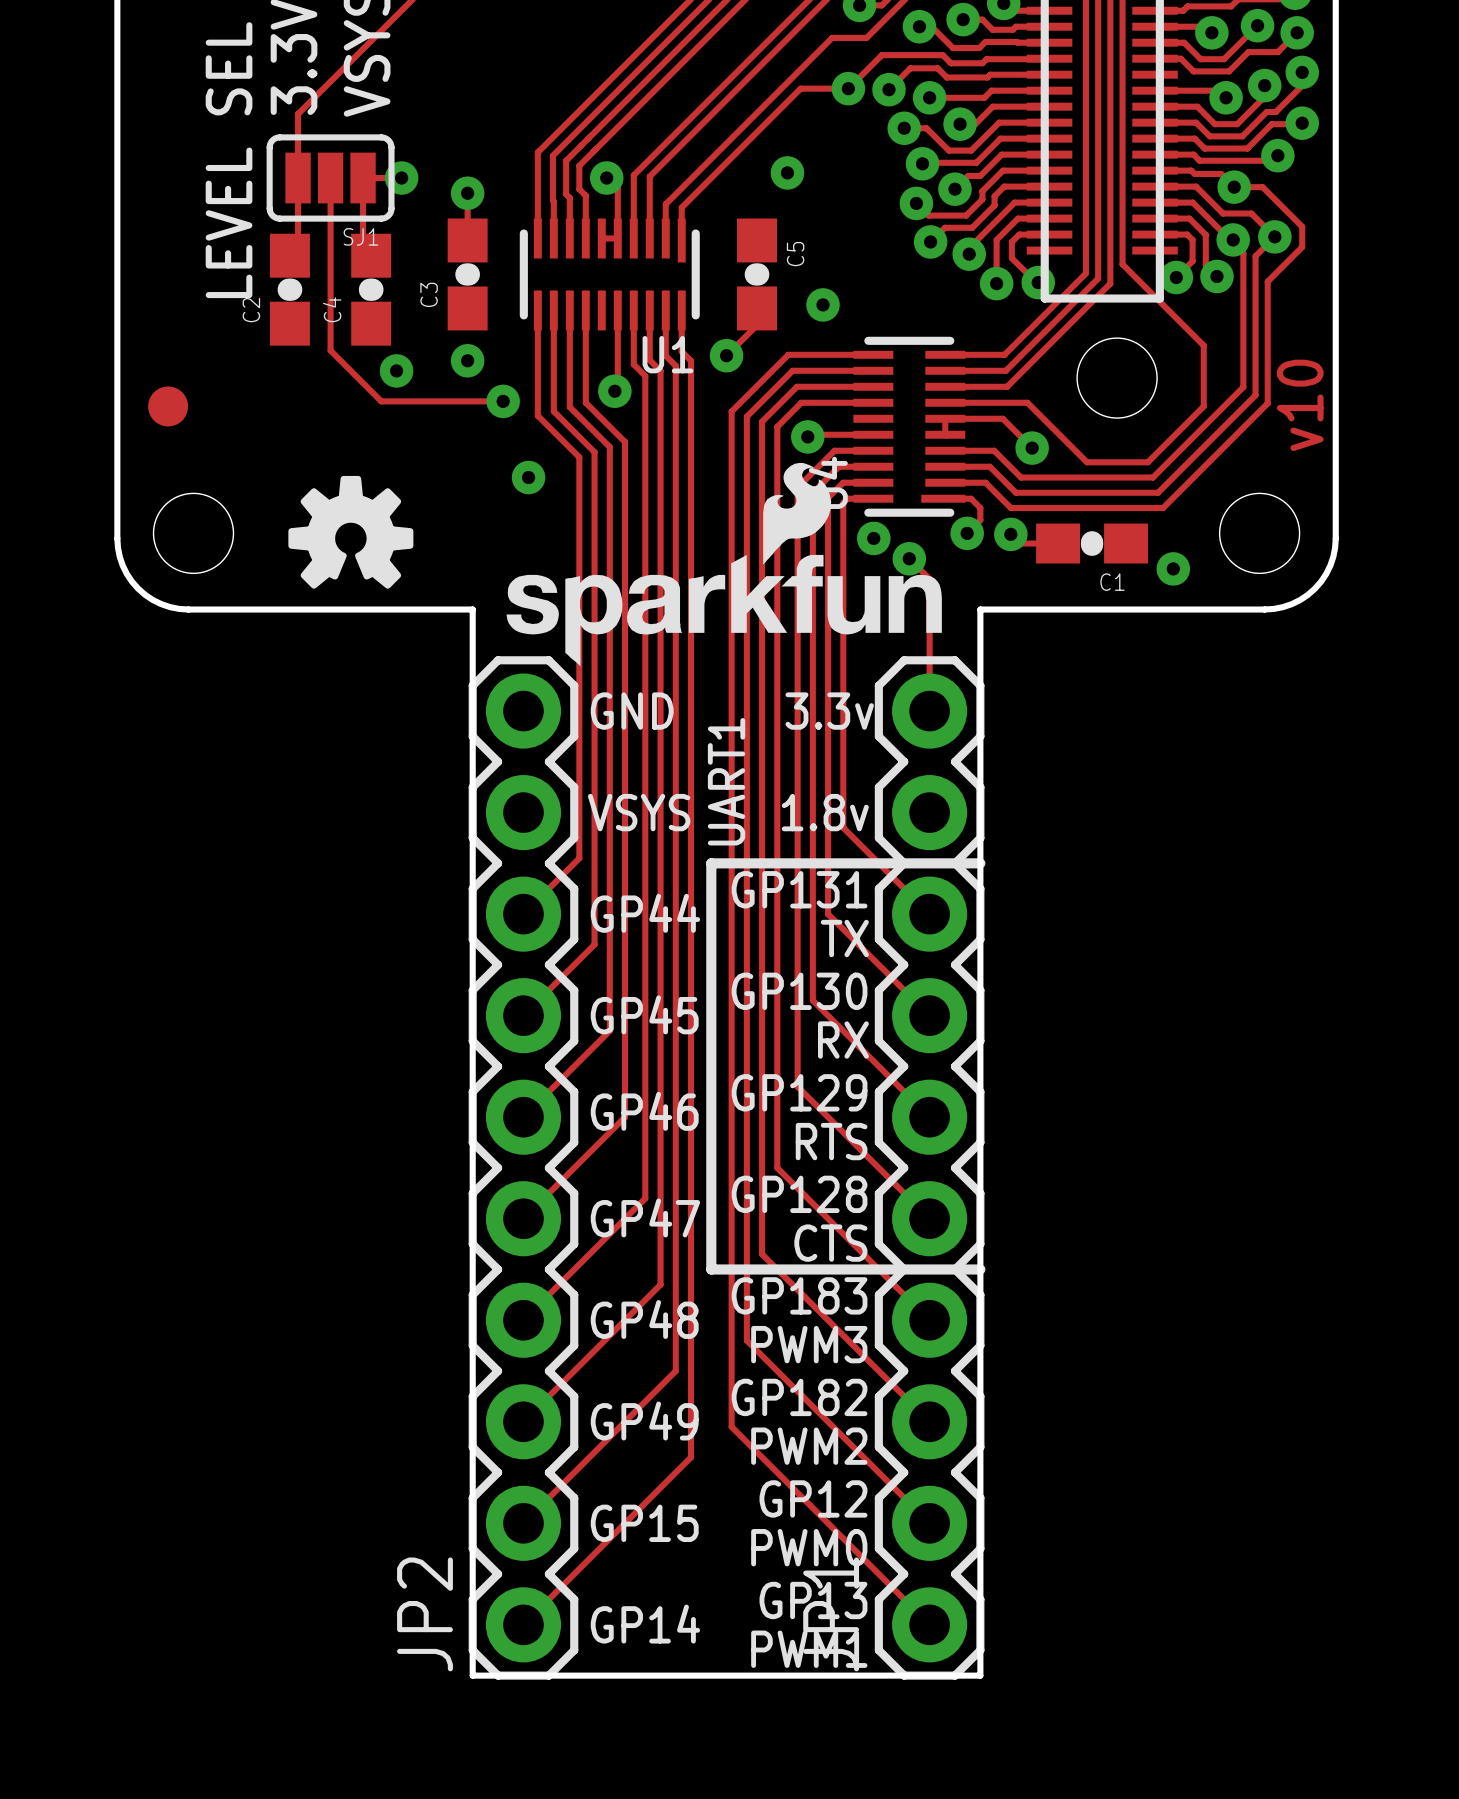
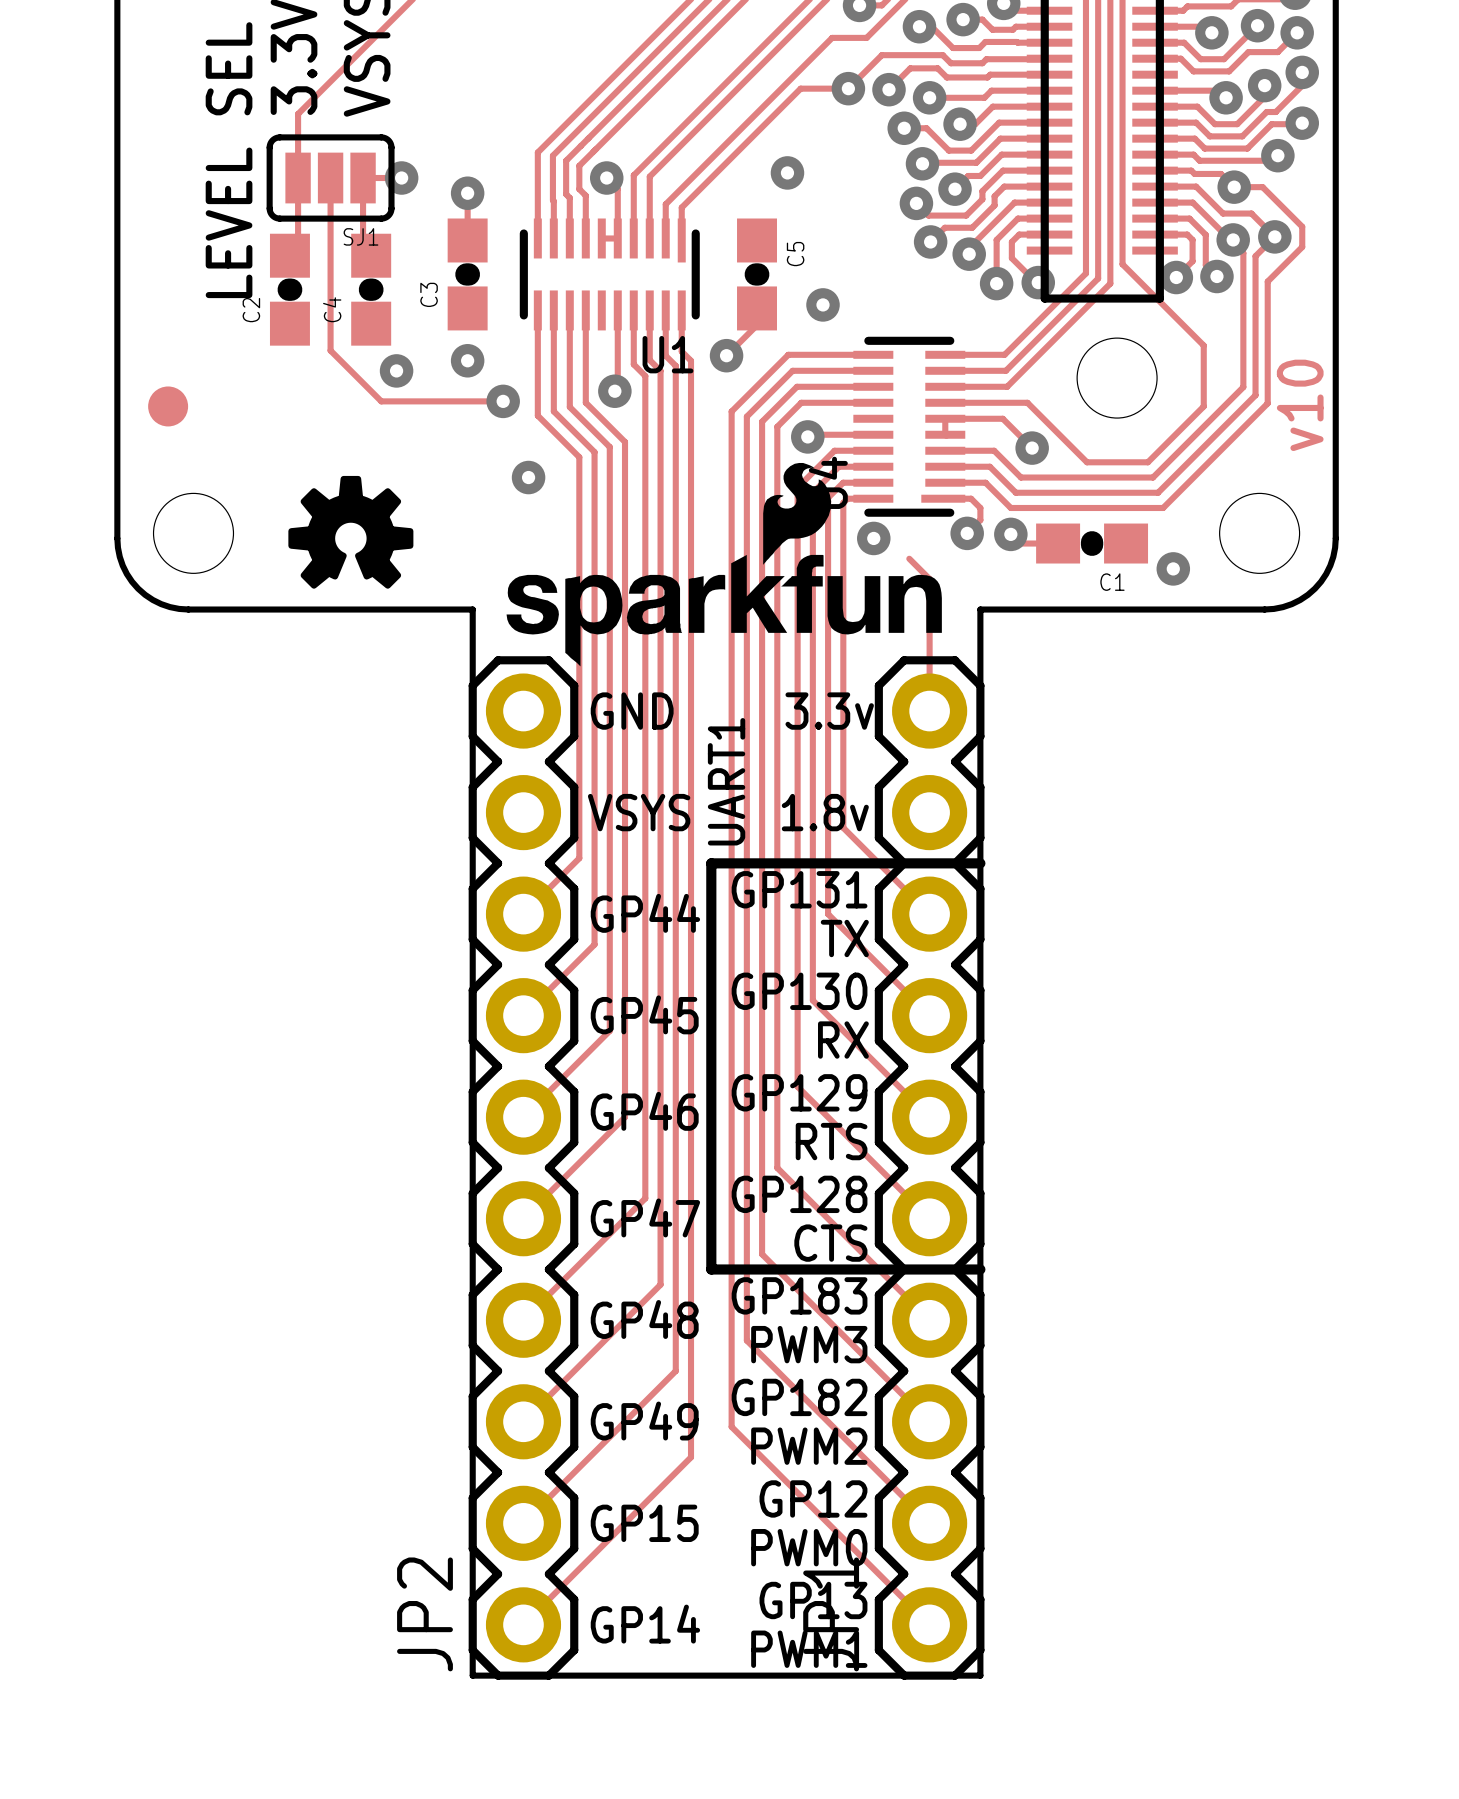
via: (909, 558) -> none

